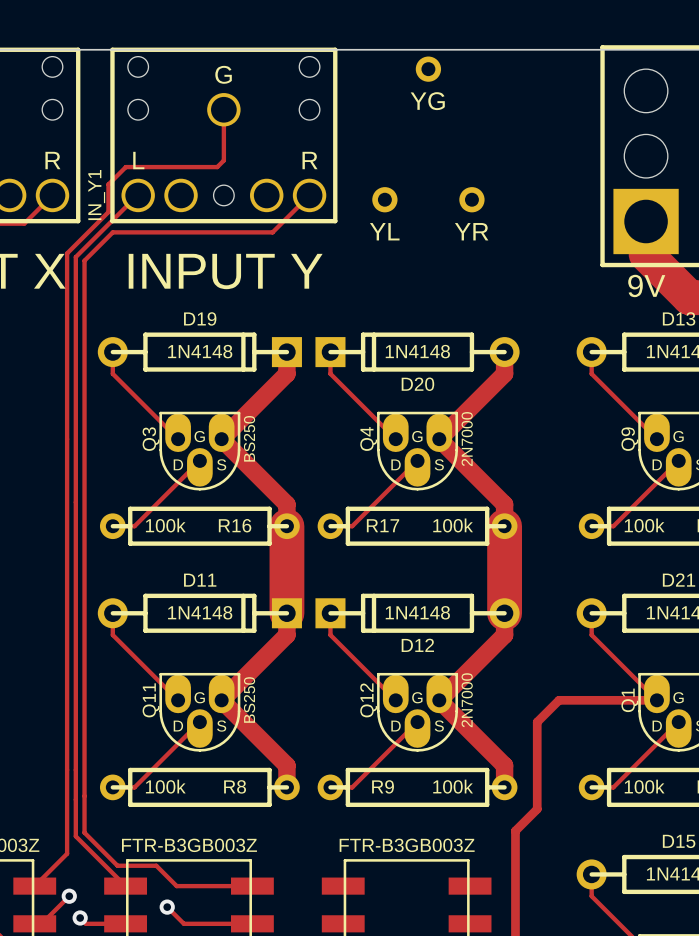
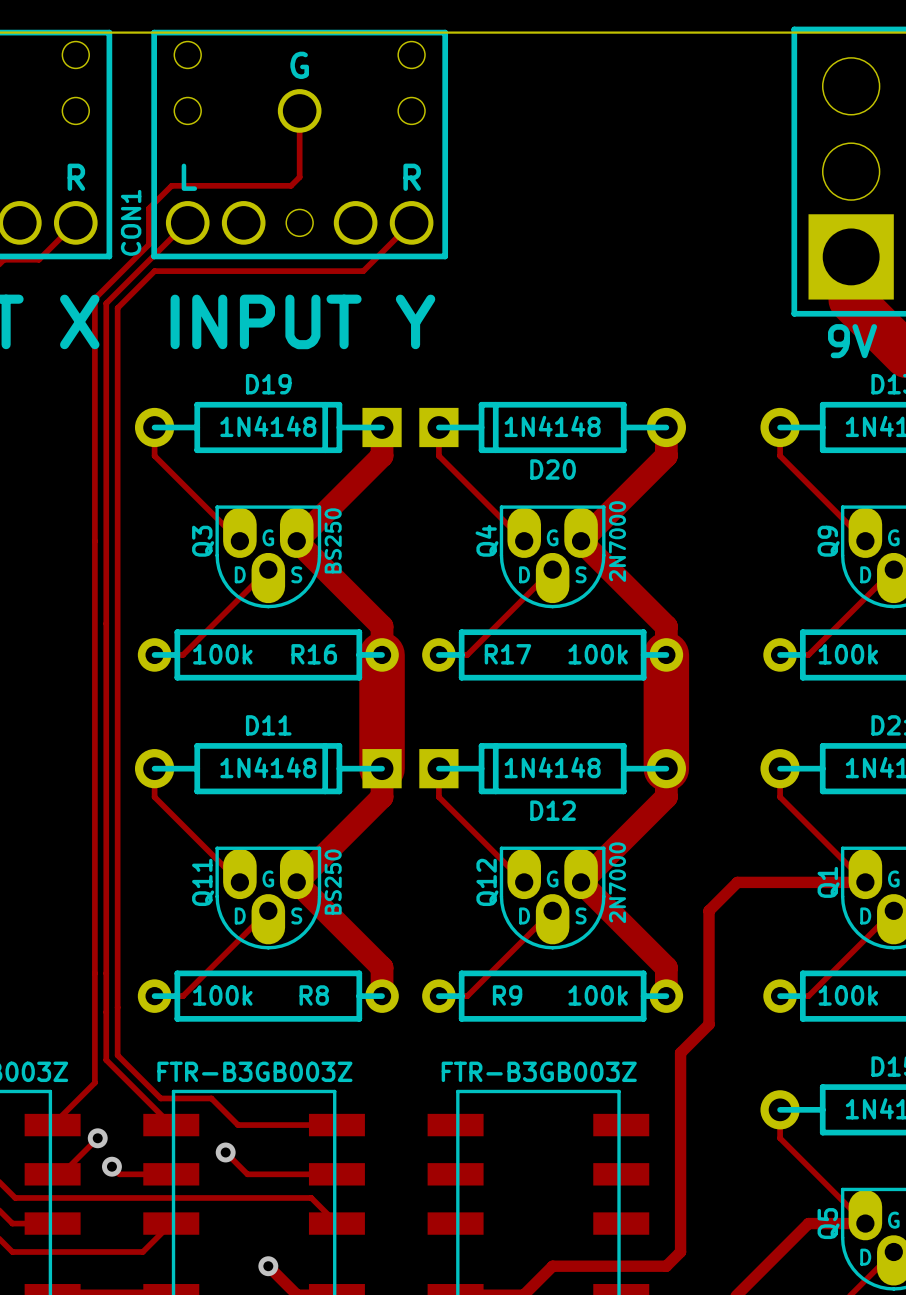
part: (428, 69) -> none
text: YG (427, 101) -> none
IN_Y1 name: IN_Y1 (96, 195) -> CON1 (131, 222)
part: (384, 199) -> none
part: (471, 199) -> none
text: YL (384, 231) -> none
text: YR (471, 231) -> none

